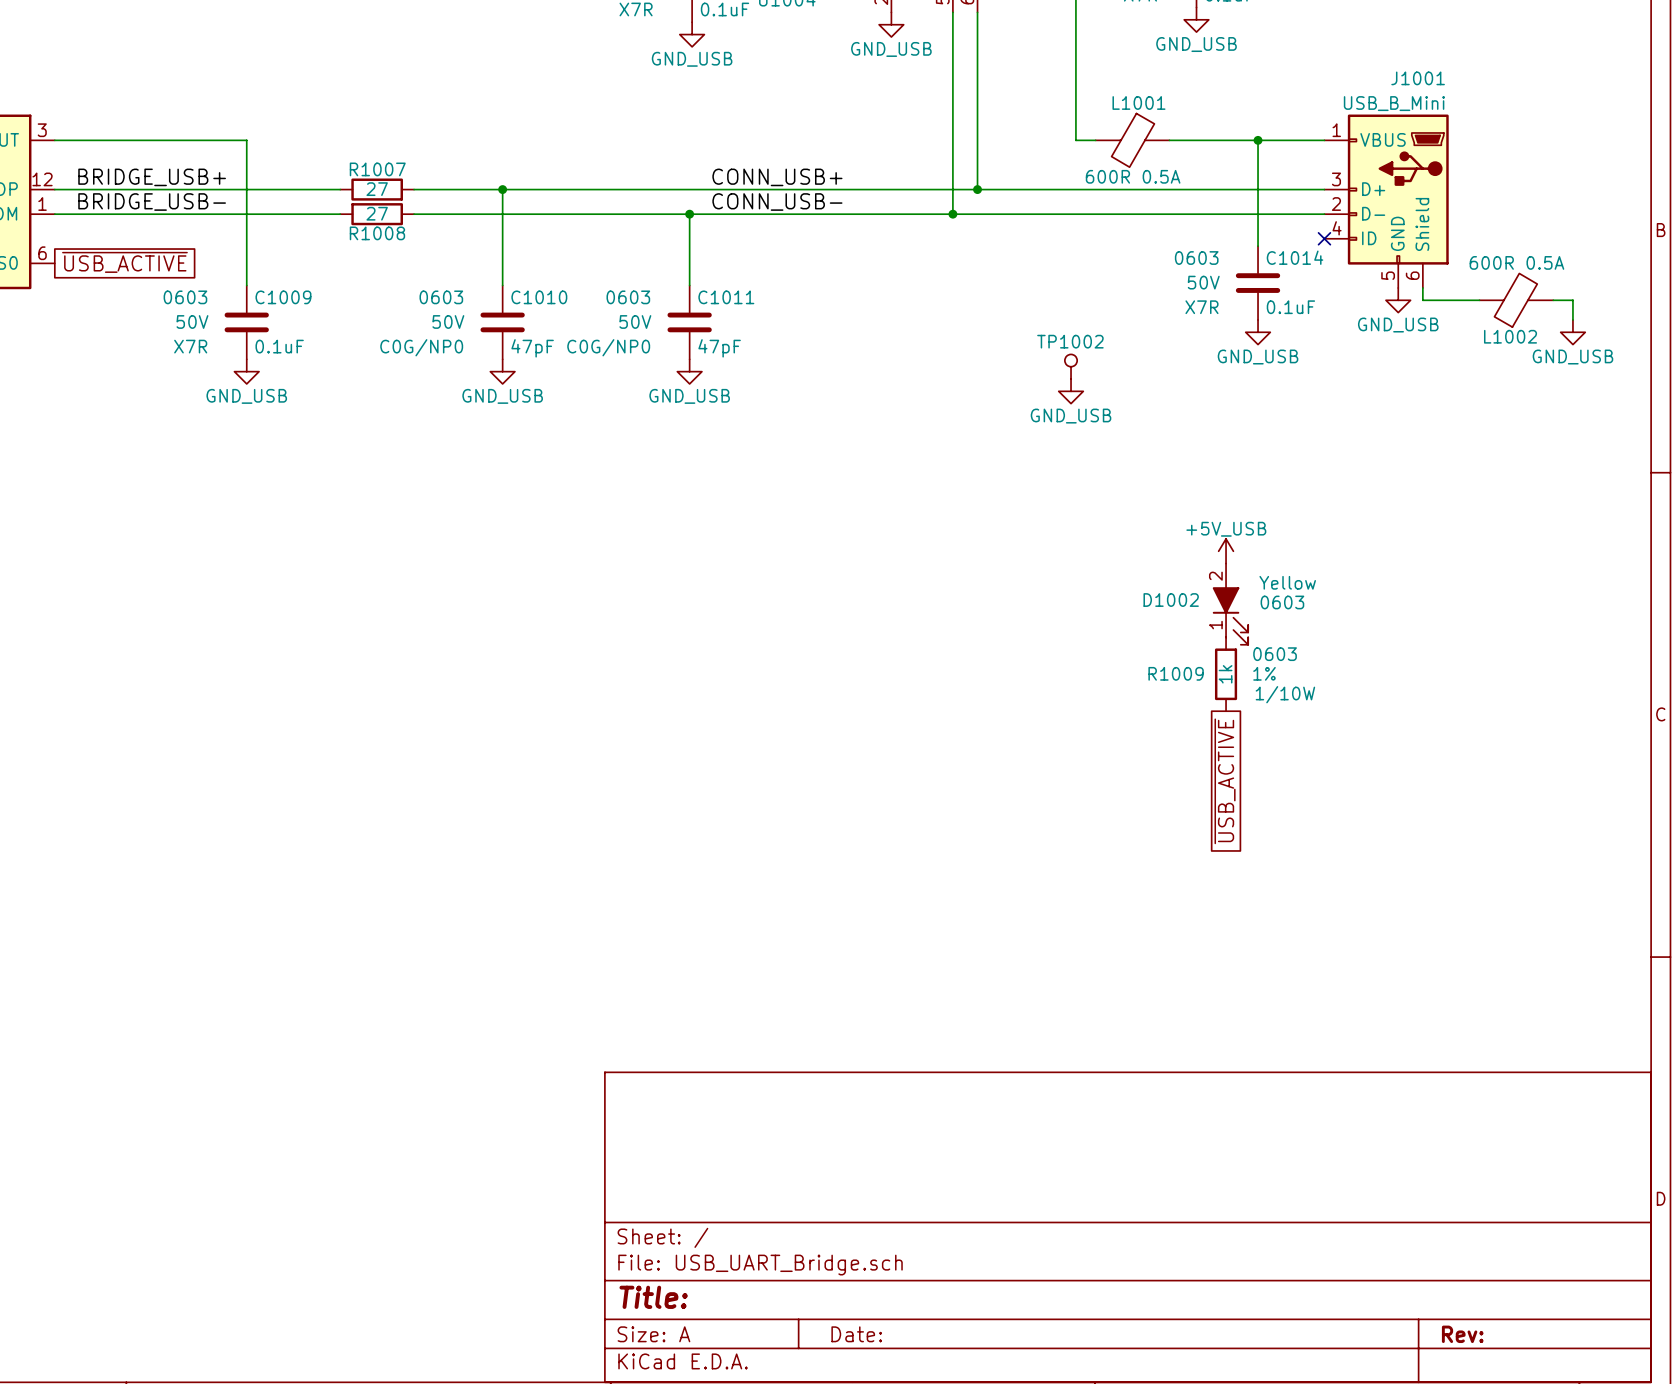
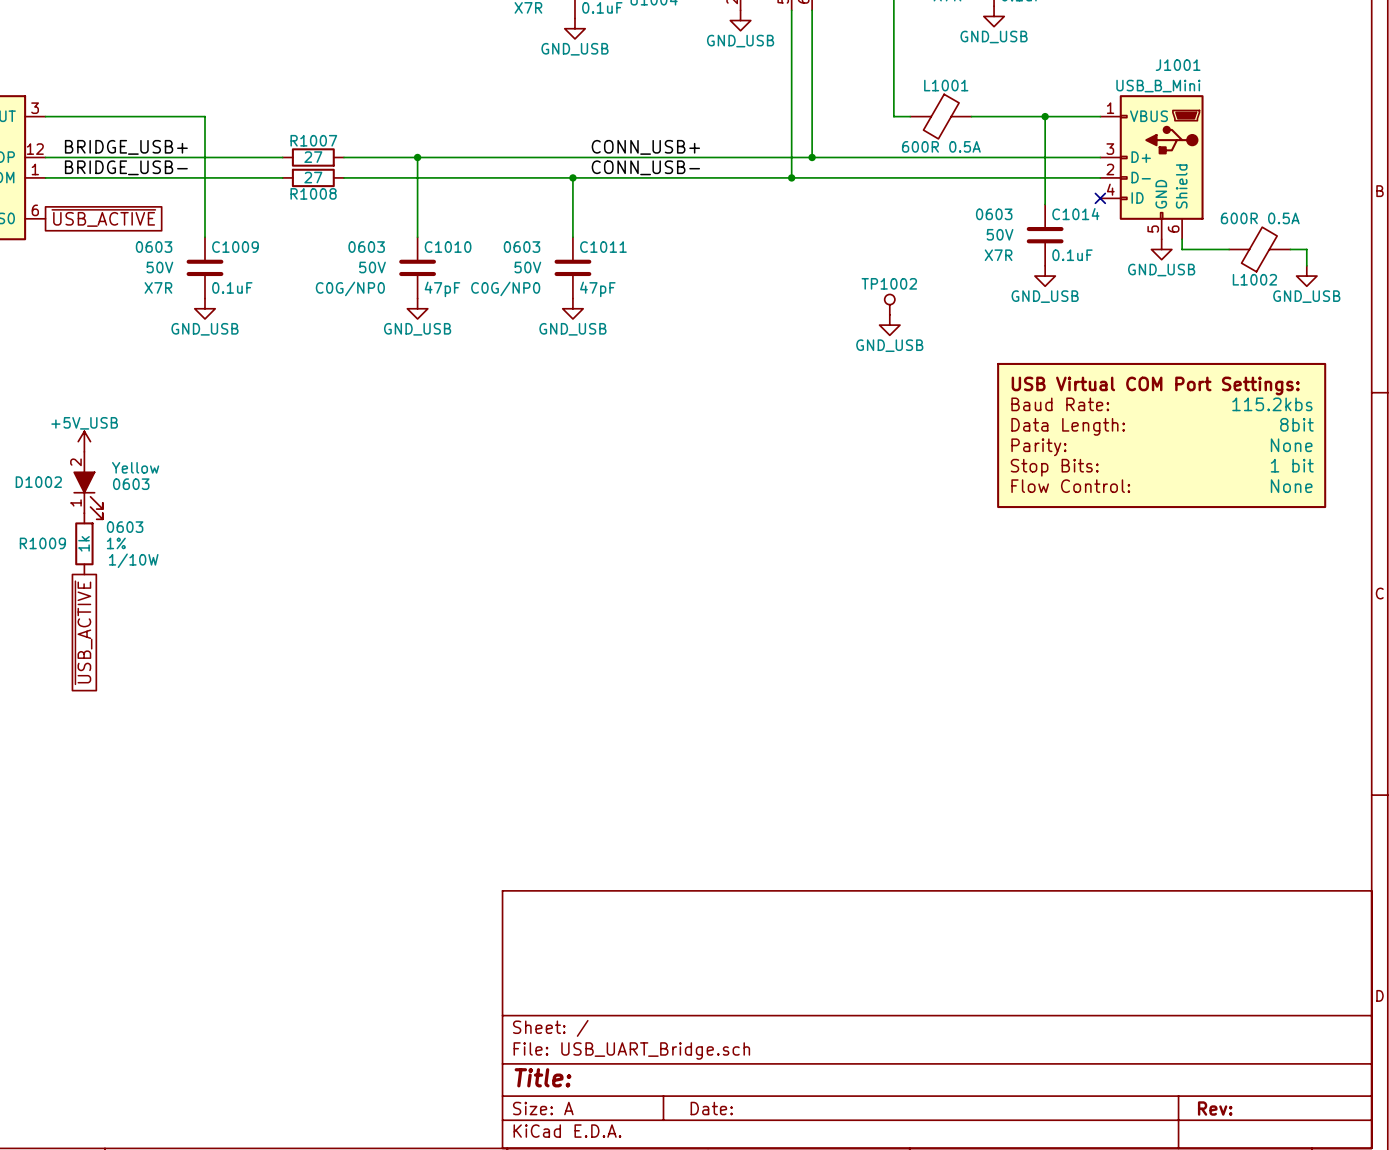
part: none -> (1161, 435)
power symbol: none -> +5V_USB (84, 441)
power symbol: +5V_USB (1226, 551) -> none
D1002 position: (1230, 604) -> (88, 485)
R1009 position: (1226, 674) -> (84, 543)
global label: none -> ~{USB_ACTIVE} (83, 632)
global label: ~{USB_ACTIVE} (1225, 781) -> none

